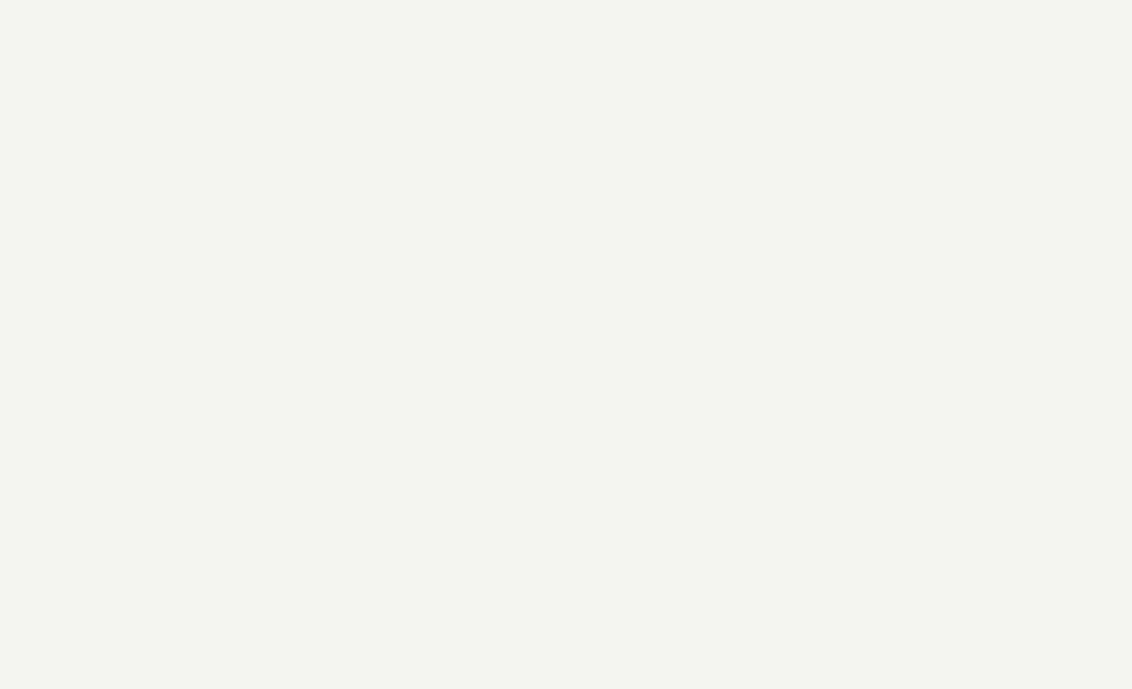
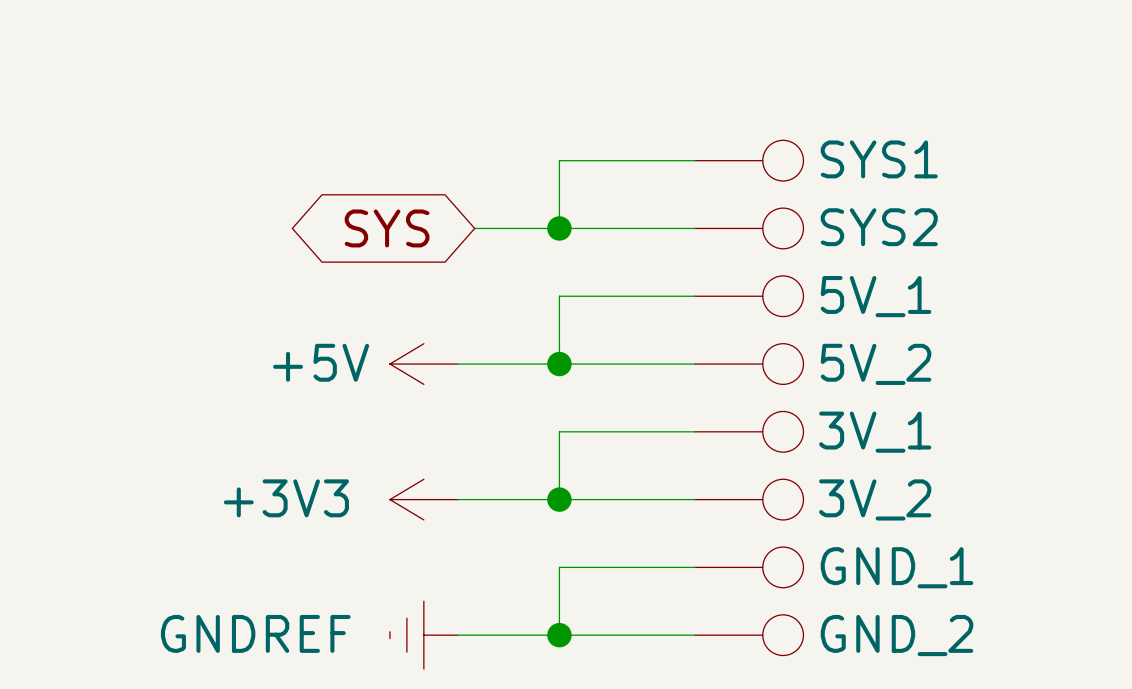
wire: none -> (695, 160) (559, 160) (559, 228)
part: none -> SYS1 (749, 160)
global label: none -> SYS (387, 228)
wire: none -> (474, 228) (695, 228)
junction: none -> (559, 228)
part: none -> SYS2 (749, 228)
wire: none -> (695, 296) (559, 296) (559, 364)
part: none -> 5V_1 (749, 296)
power symbol: none -> +5V (423, 364)
wire: none -> (457, 364) (695, 364)
junction: none -> (559, 364)
part: none -> 5V_2 (749, 364)
wire: none -> (695, 431) (559, 431) (559, 499)
part: none -> 3V_1 (749, 431)
power symbol: none -> +3V3 (423, 499)
wire: none -> (457, 499) (695, 499)
junction: none -> (559, 499)
part: none -> 3V_2 (749, 499)
wire: none -> (695, 567) (559, 567) (559, 635)
part: none -> GND_1 (749, 567)
power symbol: none -> GNDREF (423, 635)
wire: none -> (457, 635) (695, 635)
junction: none -> (559, 635)
part: none -> GND_2 (749, 635)

